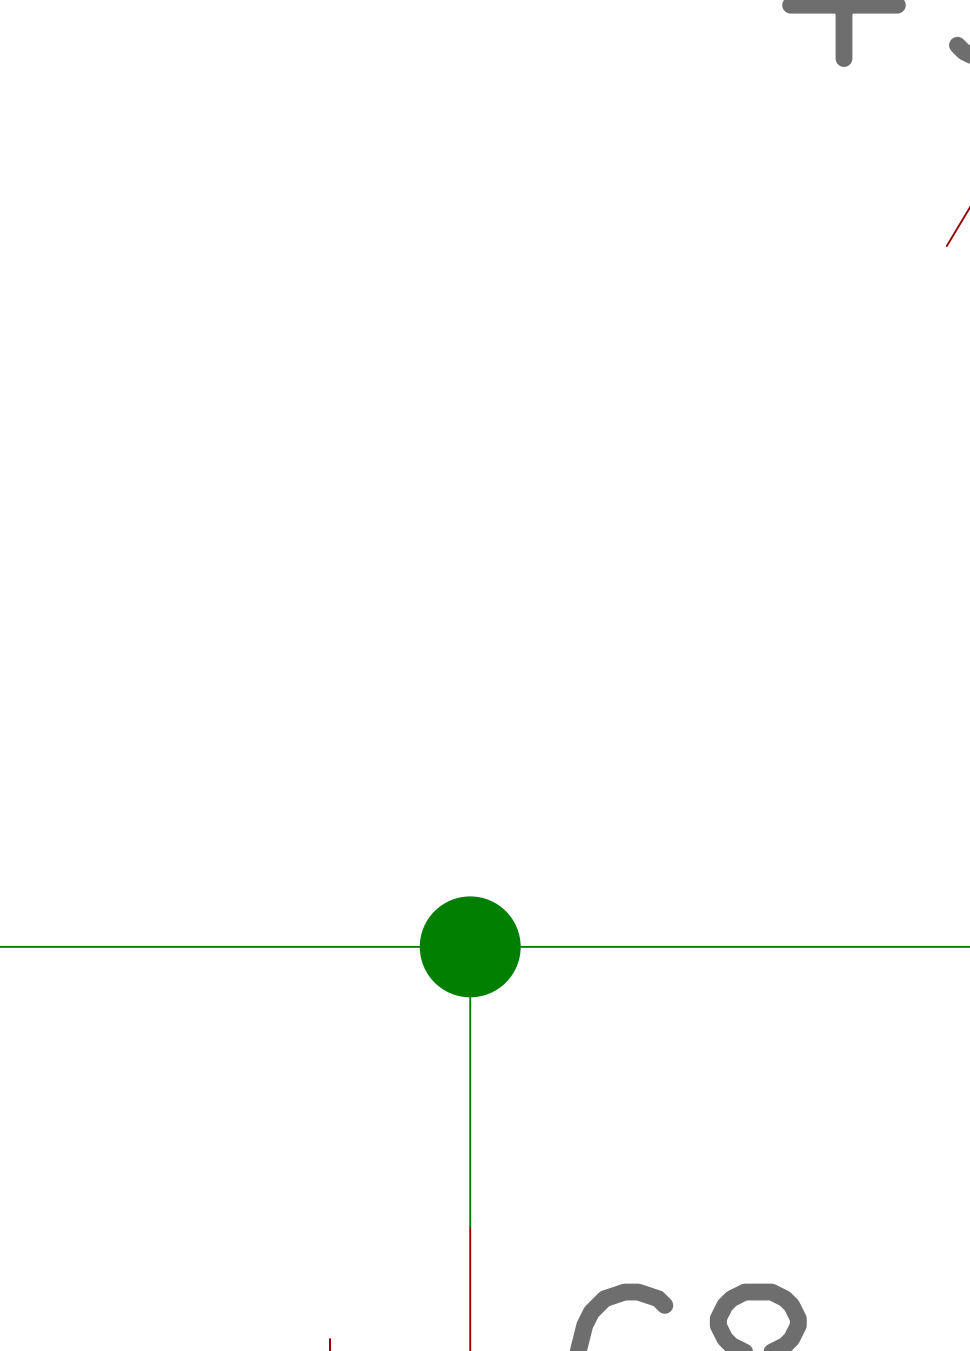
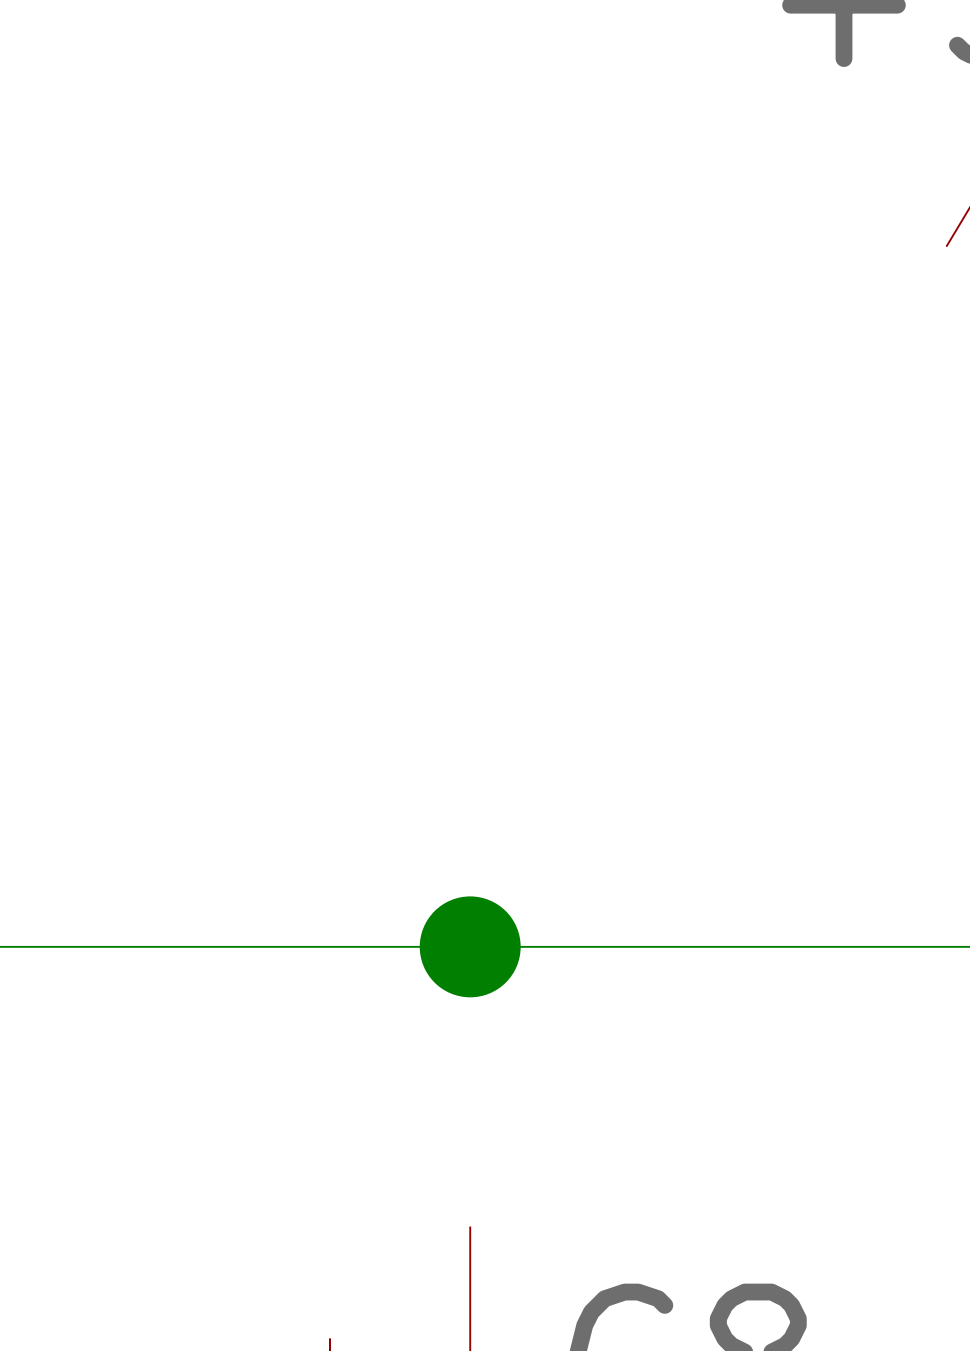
wire: (470, 946) (470, 1227) -> none

